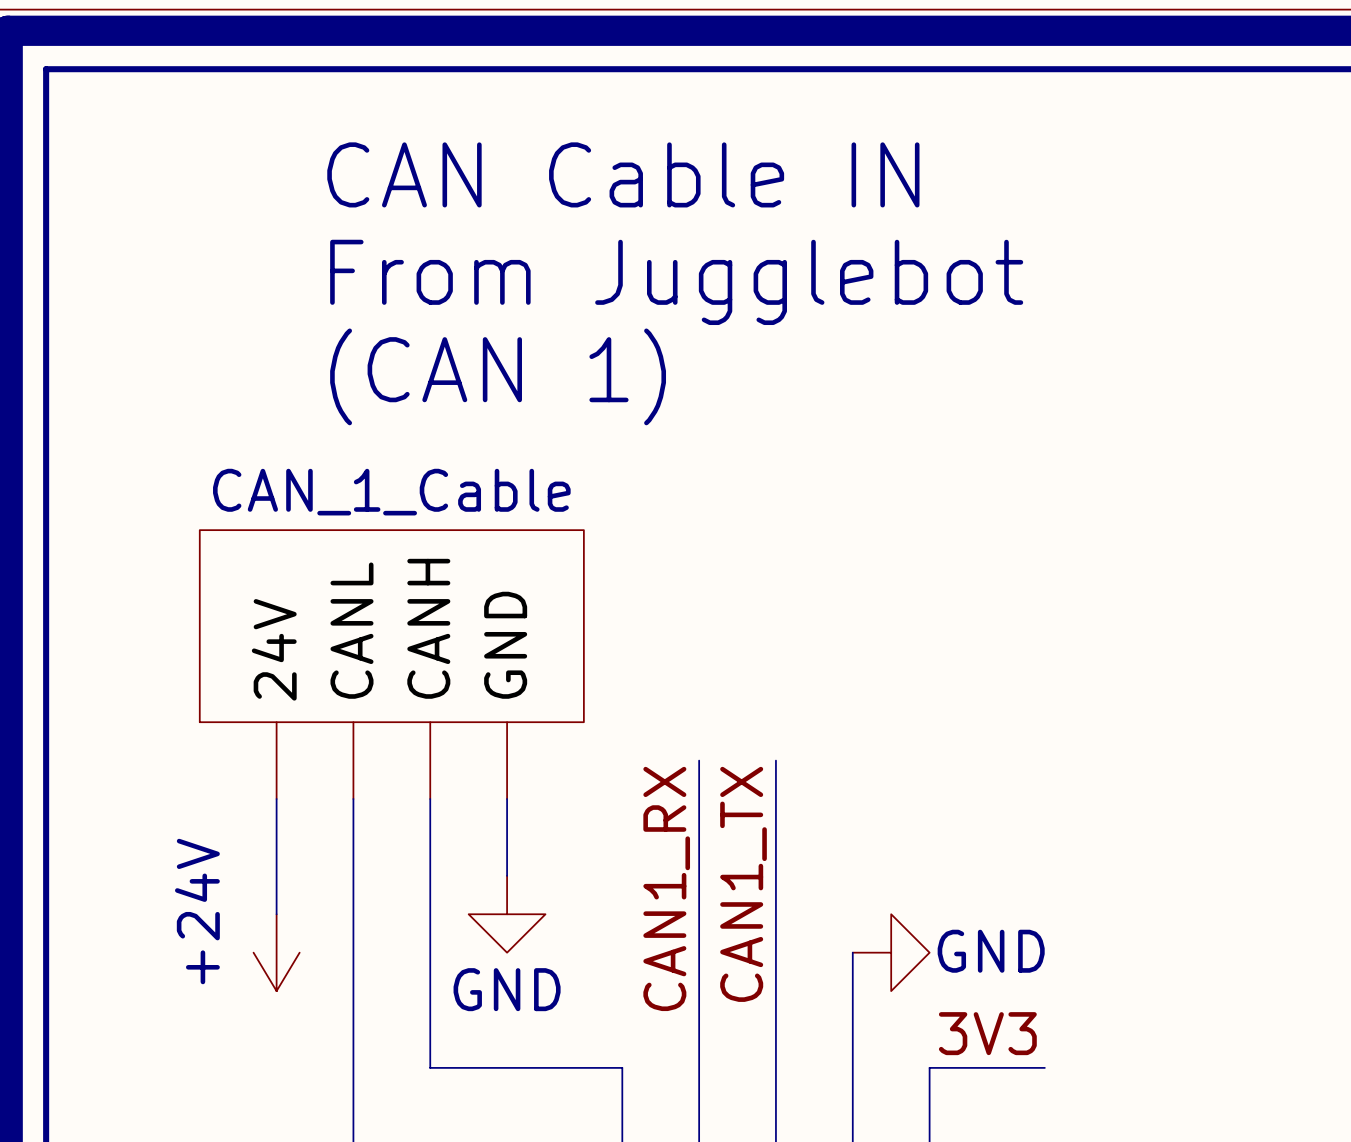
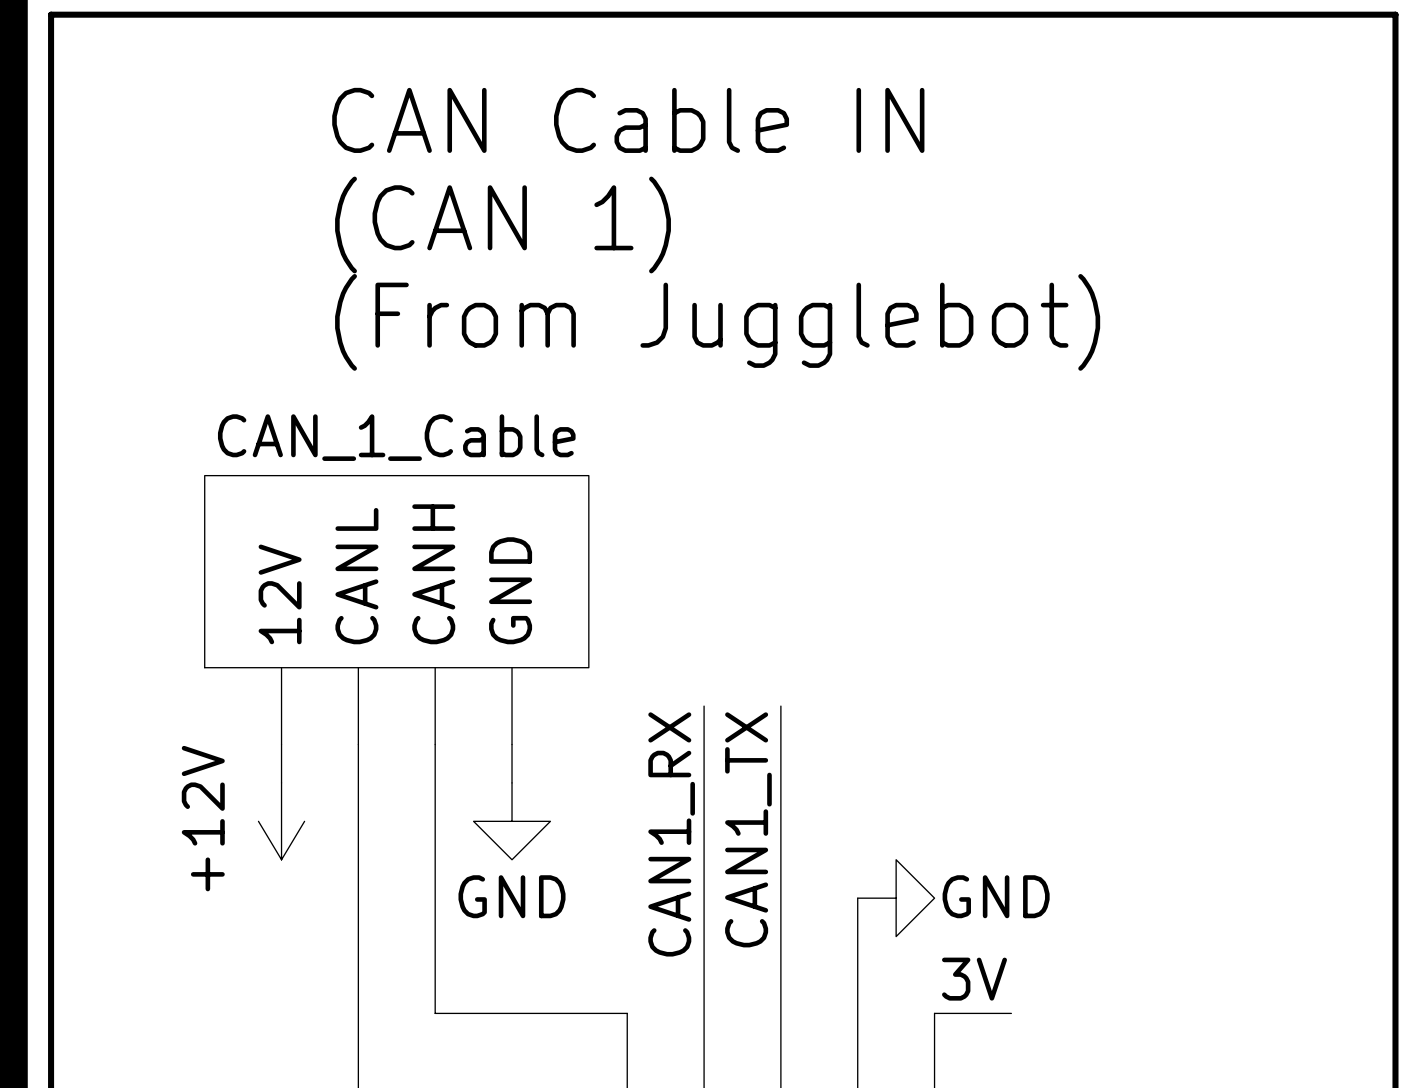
text: From Jugglebot (676, 282) -> (CAN 1) (503, 224)
text: (CAN 1) (498, 376) -> (From Jugglebot) (717, 322)
power symbol pin name: 24V (274, 649) -> 12V (280, 594)
power symbol: none -> +12V (281, 821)
power symbol position: GND (507, 914) -> GND (512, 821)
power symbol: +24V (276, 952) -> none
label: 3V3 (987, 1033) -> 3V (974, 979)
wire: (1006, 1067) (1044, 1067) -> none

